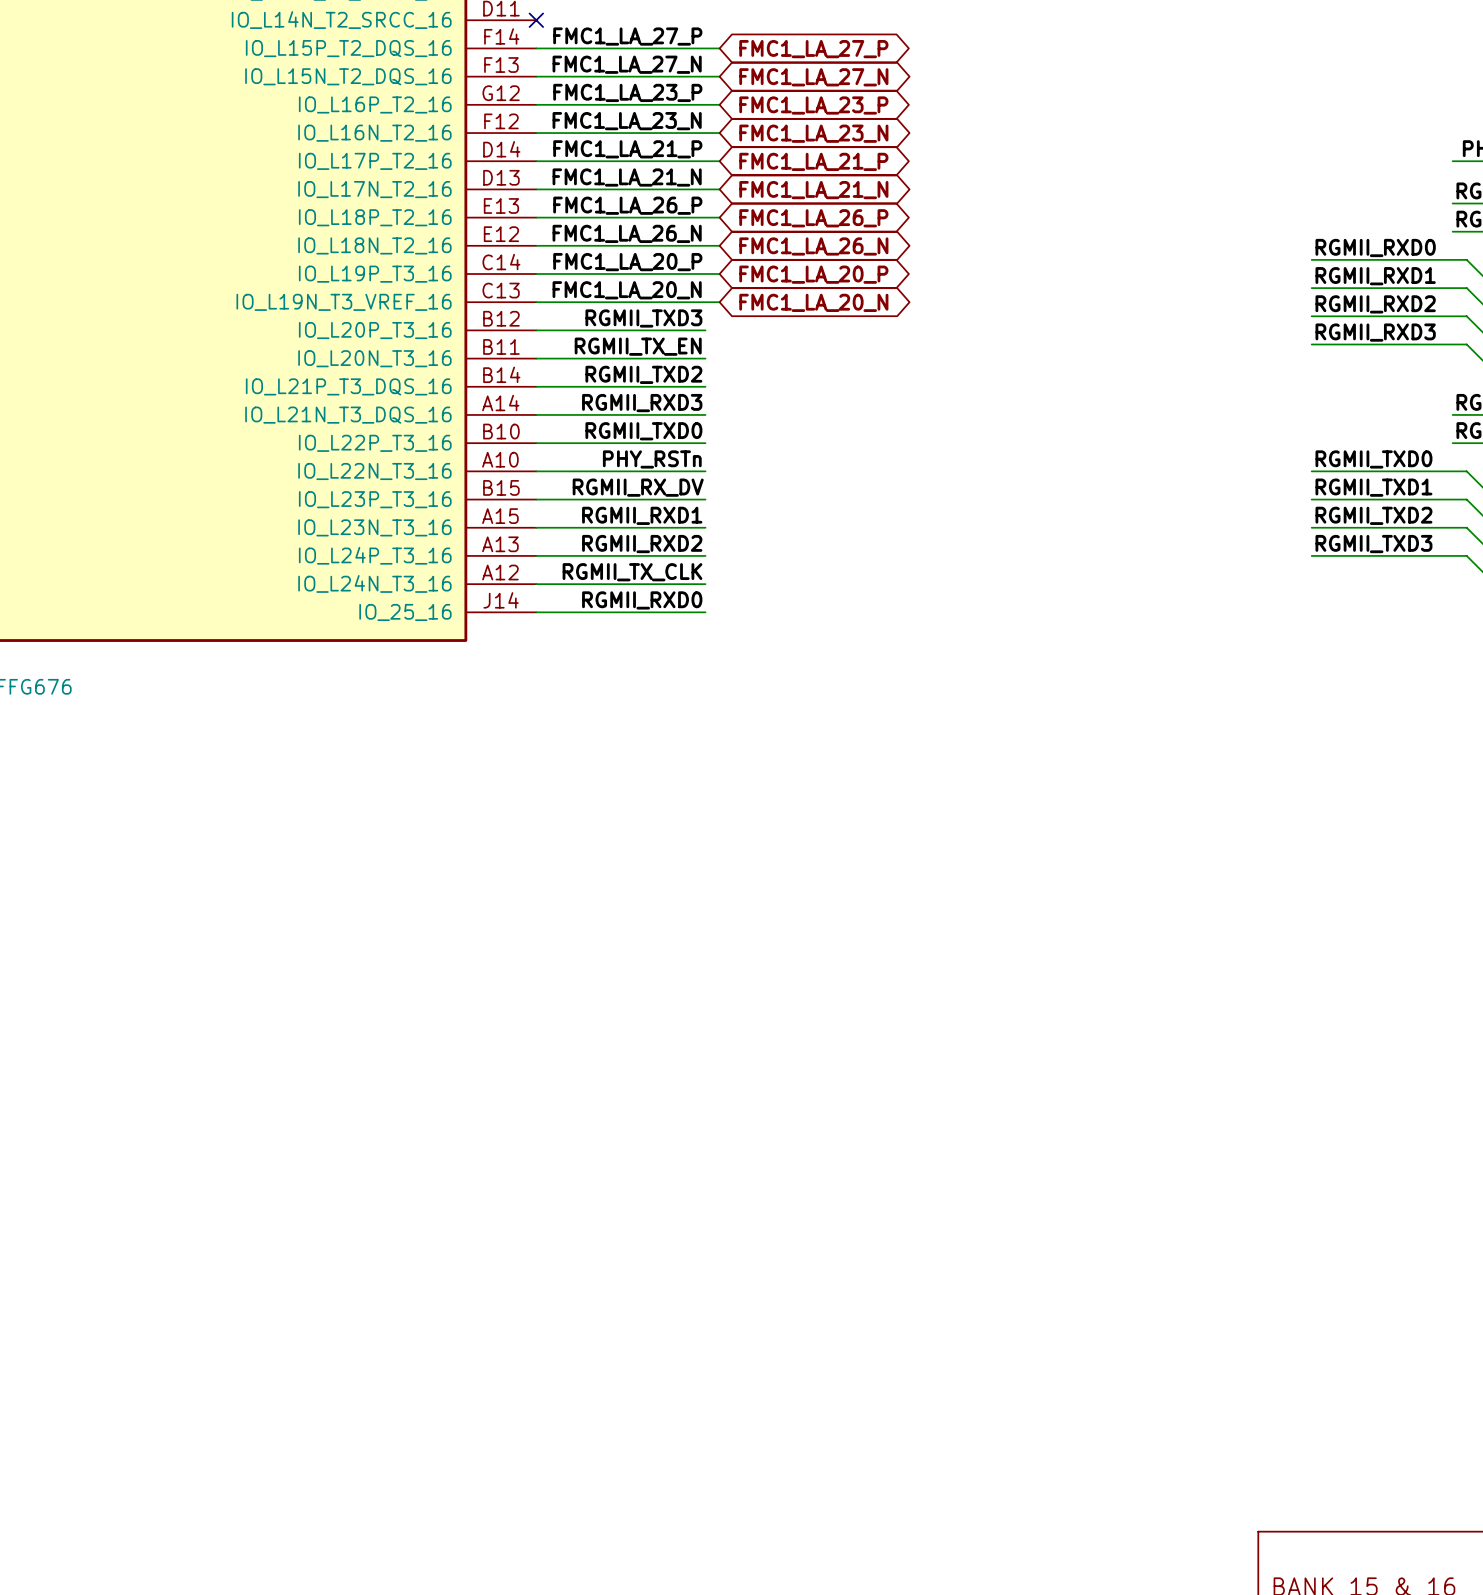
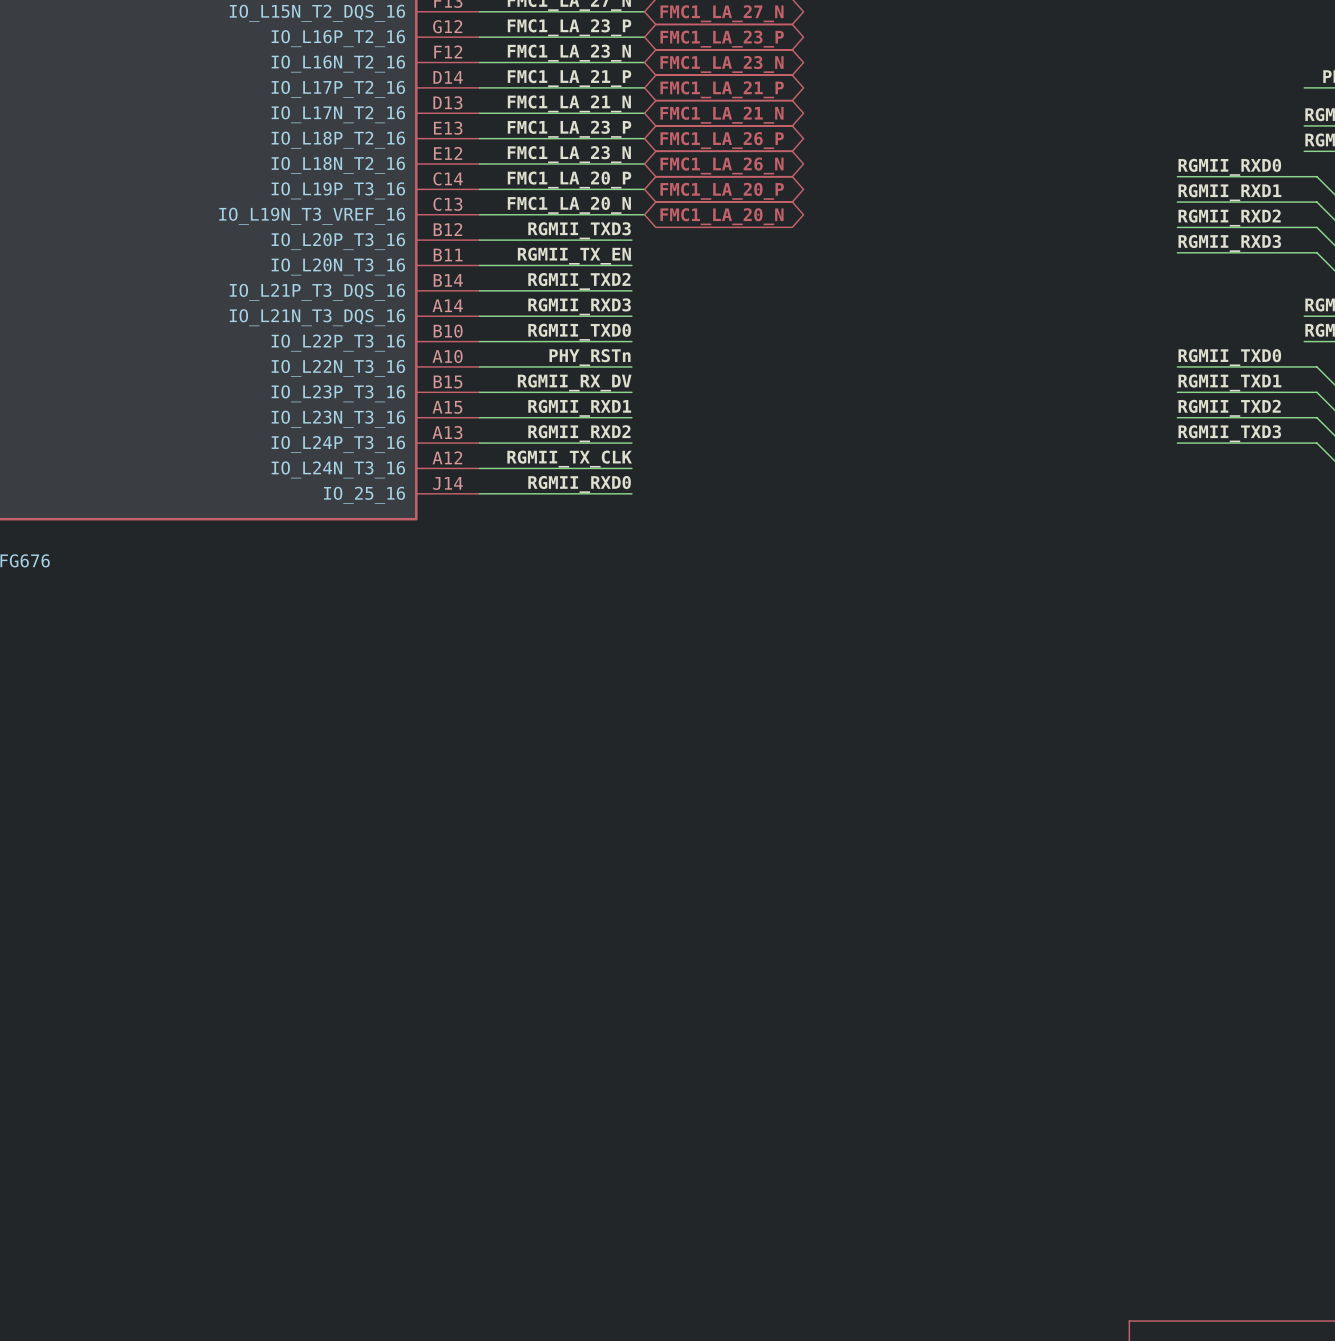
label: FMC1_LA_26_P (627, 205) -> FMC1_LA_23_P (569, 129)
label: FMC1_LA_26_N (627, 233) -> FMC1_LA_23_N (569, 154)

